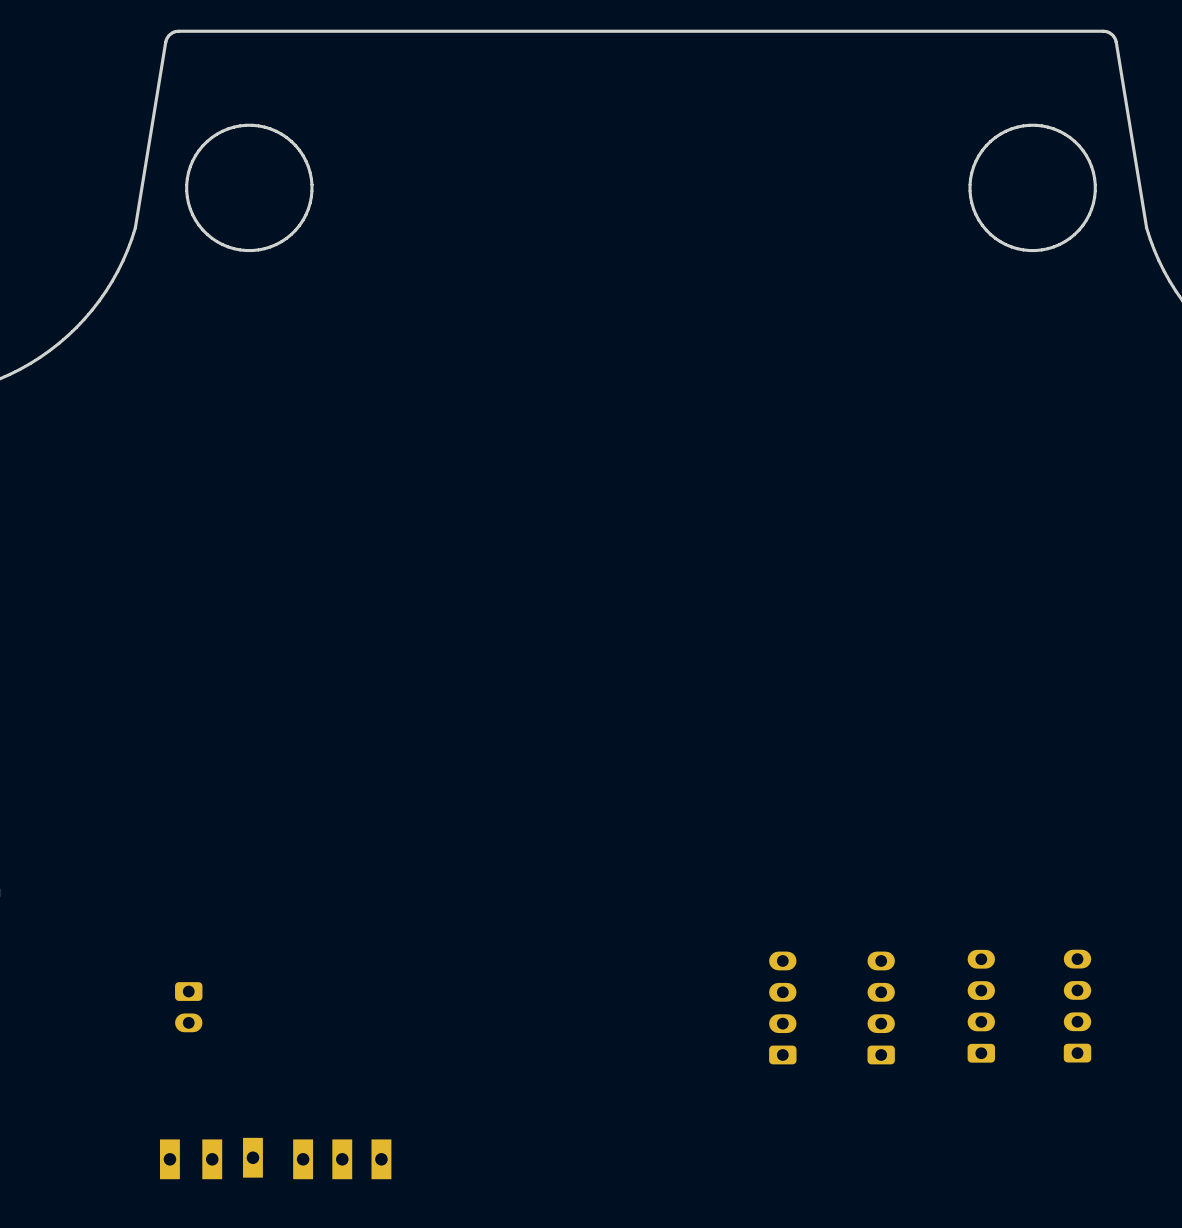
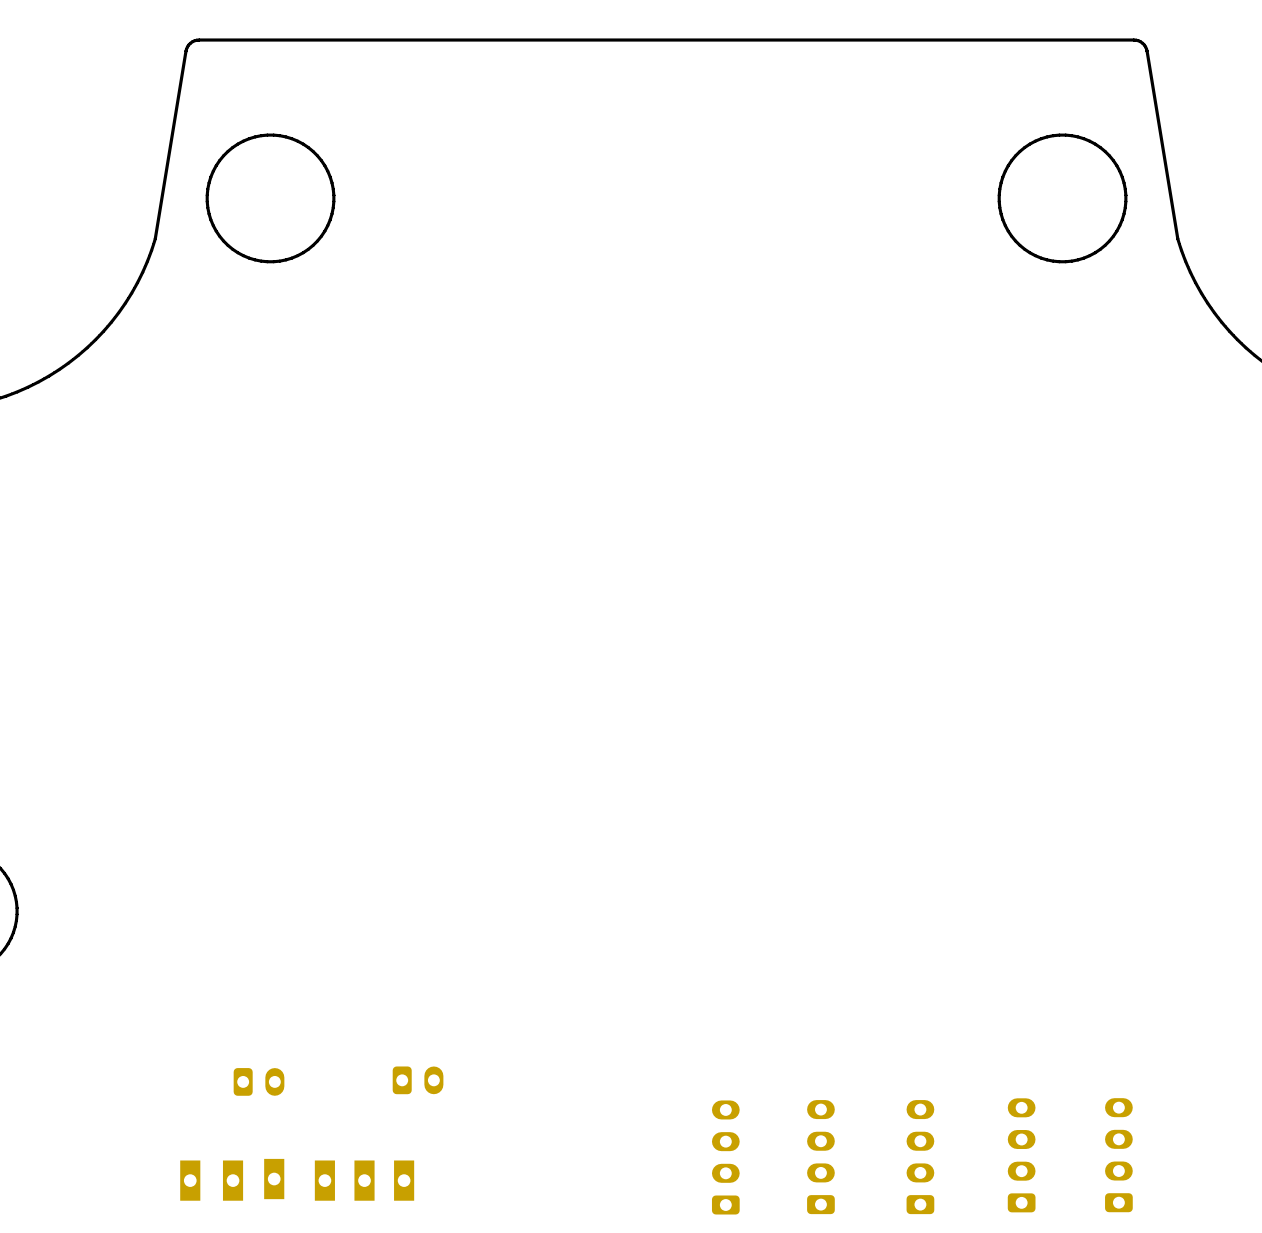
part: (981, 1006) -> none
part: (1077, 1006) -> none
part rotation: 0° (188, 1007) -> 90° counterclockwise (259, 1081)
part position: (188, 1007) -> (259, 1081)
part: (782, 1007) -> none
part: (881, 1007) -> none
part: none -> (418, 1080)
part: none -> (1021, 1155)
part: none -> (1118, 1155)
part: none -> (725, 1157)
part: none -> (820, 1157)
part: none -> (920, 1157)

